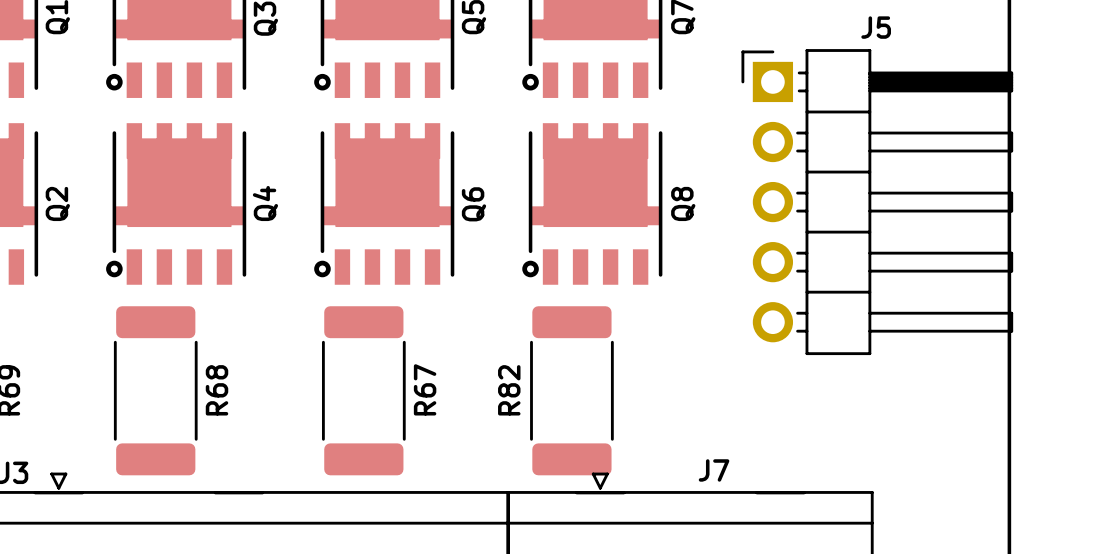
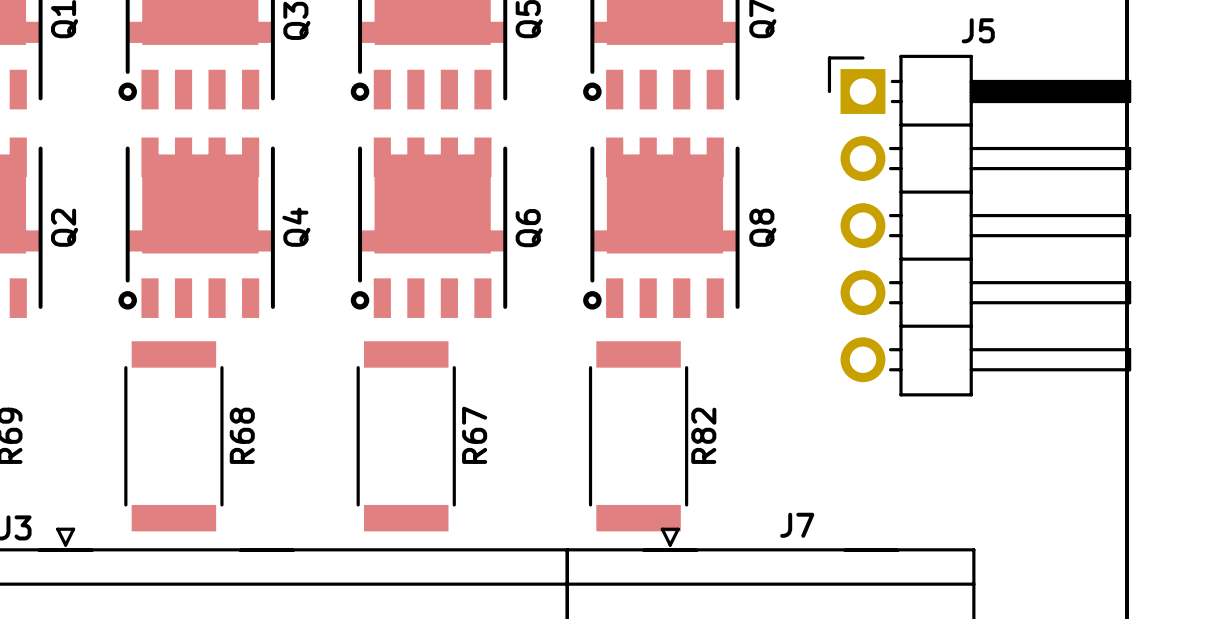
R68 footprint: [113, 306, 198, 476] -> [124, 341, 224, 532]
R67 footprint: [321, 306, 406, 476] -> [356, 341, 456, 532]
R82 footprint: [530, 306, 614, 476] -> [588, 341, 689, 532]
R82 name position: R82 (509, 390) -> R82 (703, 435)

